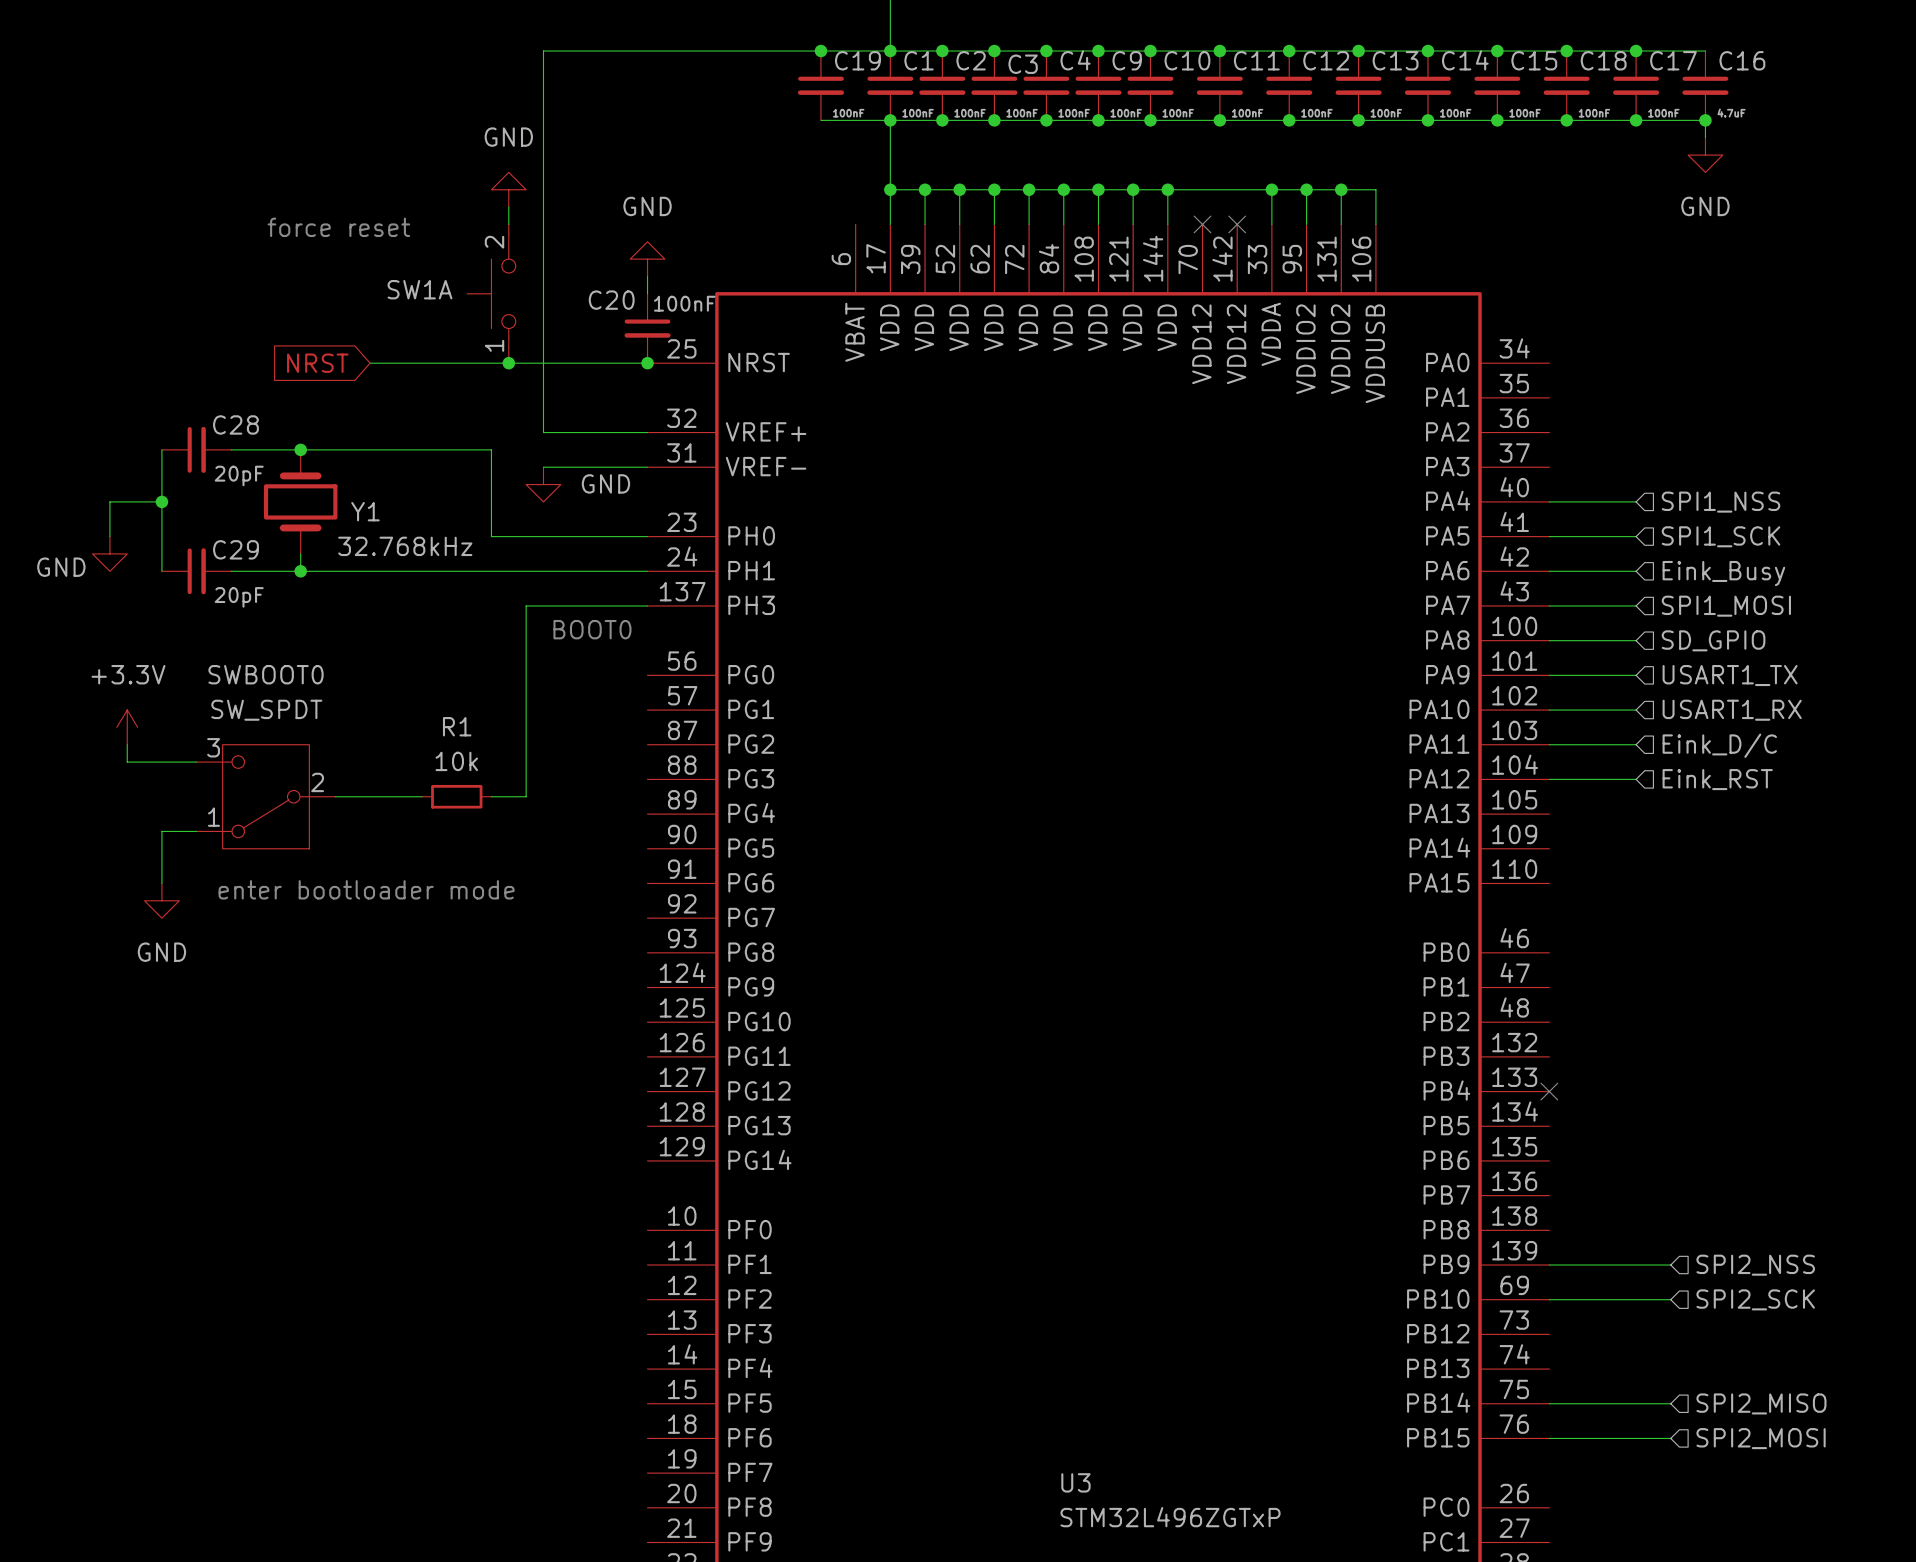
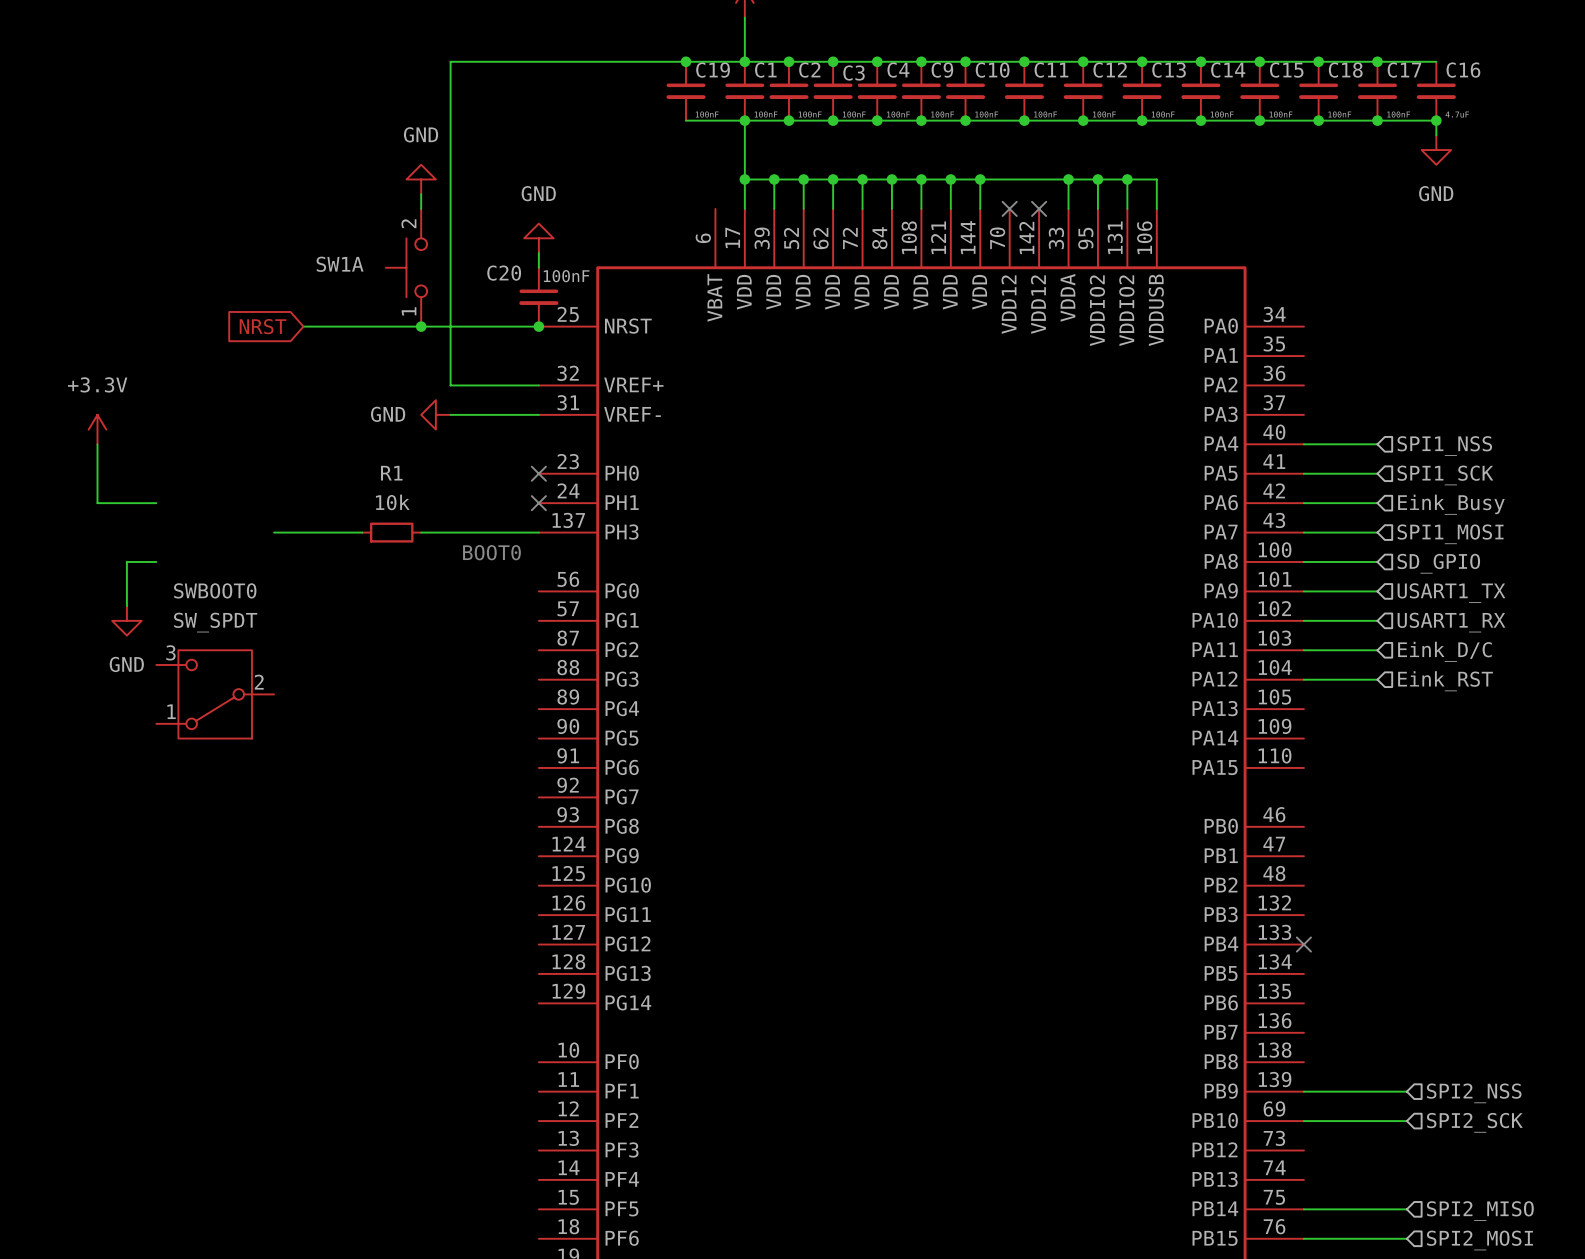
text: force reset (338, 227) -> none
wire: (161, 449) (161, 571) -> none
C28: 20pF (196, 449) -> none
wire: (231, 449) (491, 449) (491, 536) (647, 536) -> none
junction: (300, 449) -> none
power symbol text position: GND (605, 483) -> GND (388, 414)
power symbol rotation: 0° (543, 484) -> 90° clockwise (435, 414)
power symbol position: GND (543, 484) -> GND (435, 414)
wire: none -> (97, 444) (97, 503) (156, 503)
wire: (161, 501) (109, 501) (109, 536) -> none
junction: (161, 501) -> none
Y1: 32.768kHz (300, 501) -> none
no-connect mark: none -> (538, 473)
power symbol: GND (109, 553) -> none
wire: (300, 553) (300, 571) -> none
C29: 20pF (196, 571) -> none
wire: (231, 571) (647, 571) -> none
junction: (300, 571) -> none
no-connect mark: none -> (538, 503)
wire: none -> (274, 532) (362, 532)
wire: (526, 605) (526, 796) (491, 796) -> (435, 532) (421, 532)
power symbol: none -> GND (126, 620)
power symbol position: +3.3V (127, 727) -> +3.3V (97, 429)
wire: (127, 744) (127, 762) (196, 762) -> none
wire: (335, 796) (422, 796) -> none
R1 position: (456, 796) -> (391, 532)
wire: (196, 831) (161, 831) (161, 883) -> (156, 562) (126, 562) (126, 606)
text: enter bootloader mode (366, 889) -> none
power symbol: GND (161, 900) -> none

